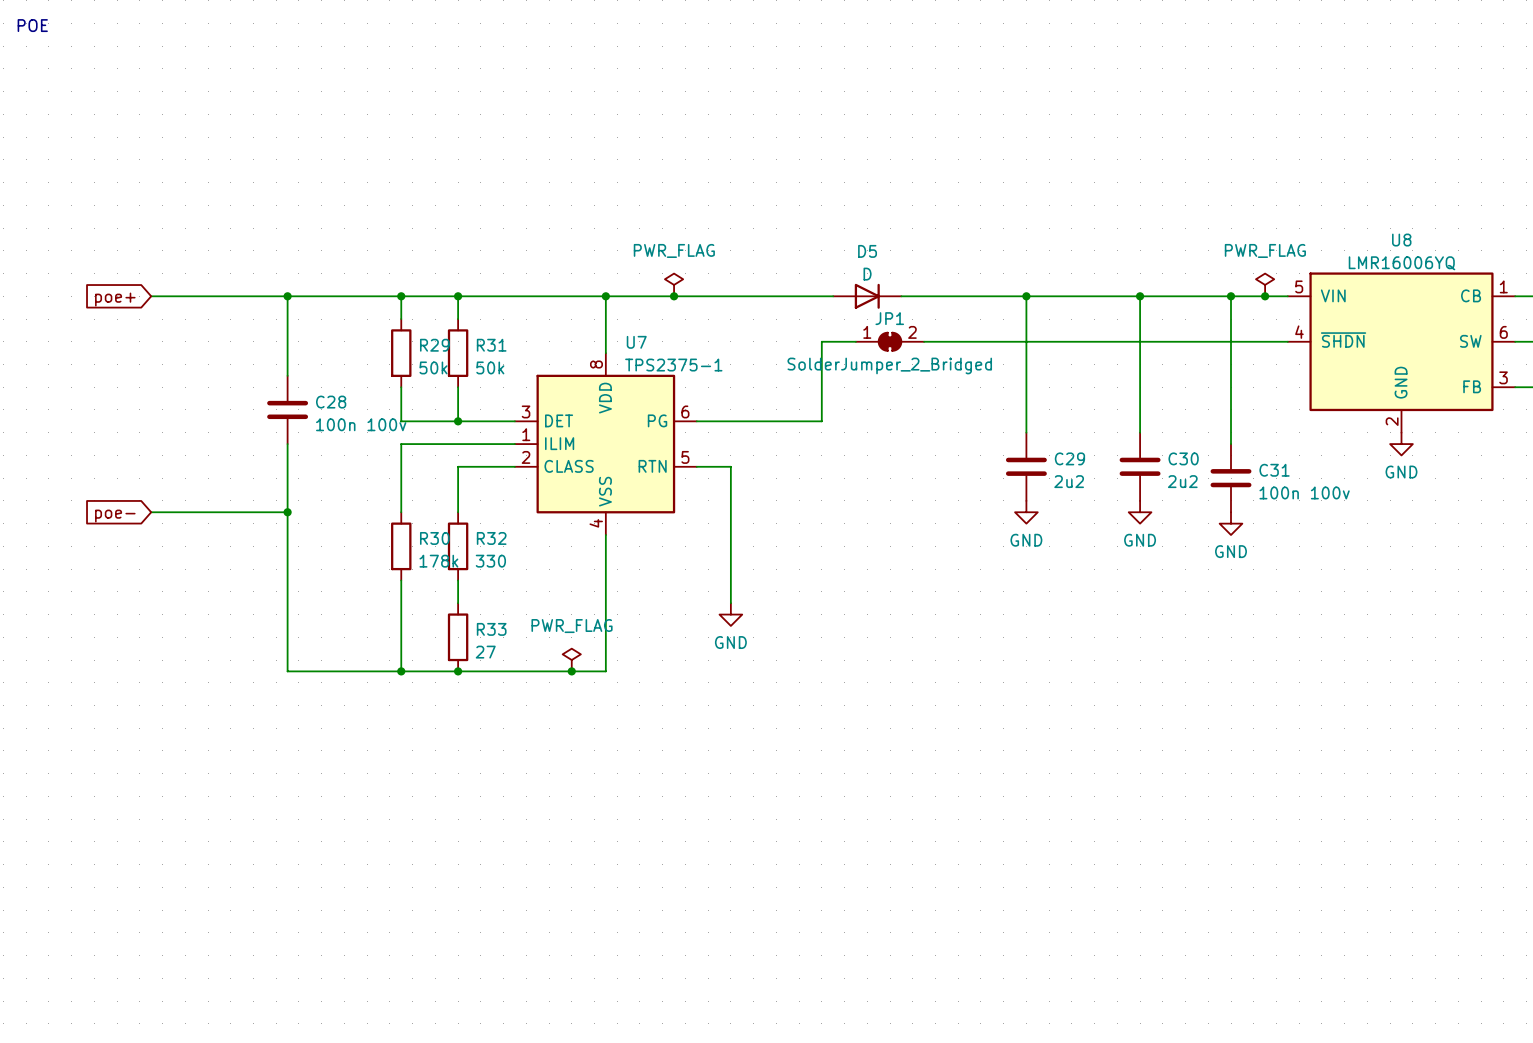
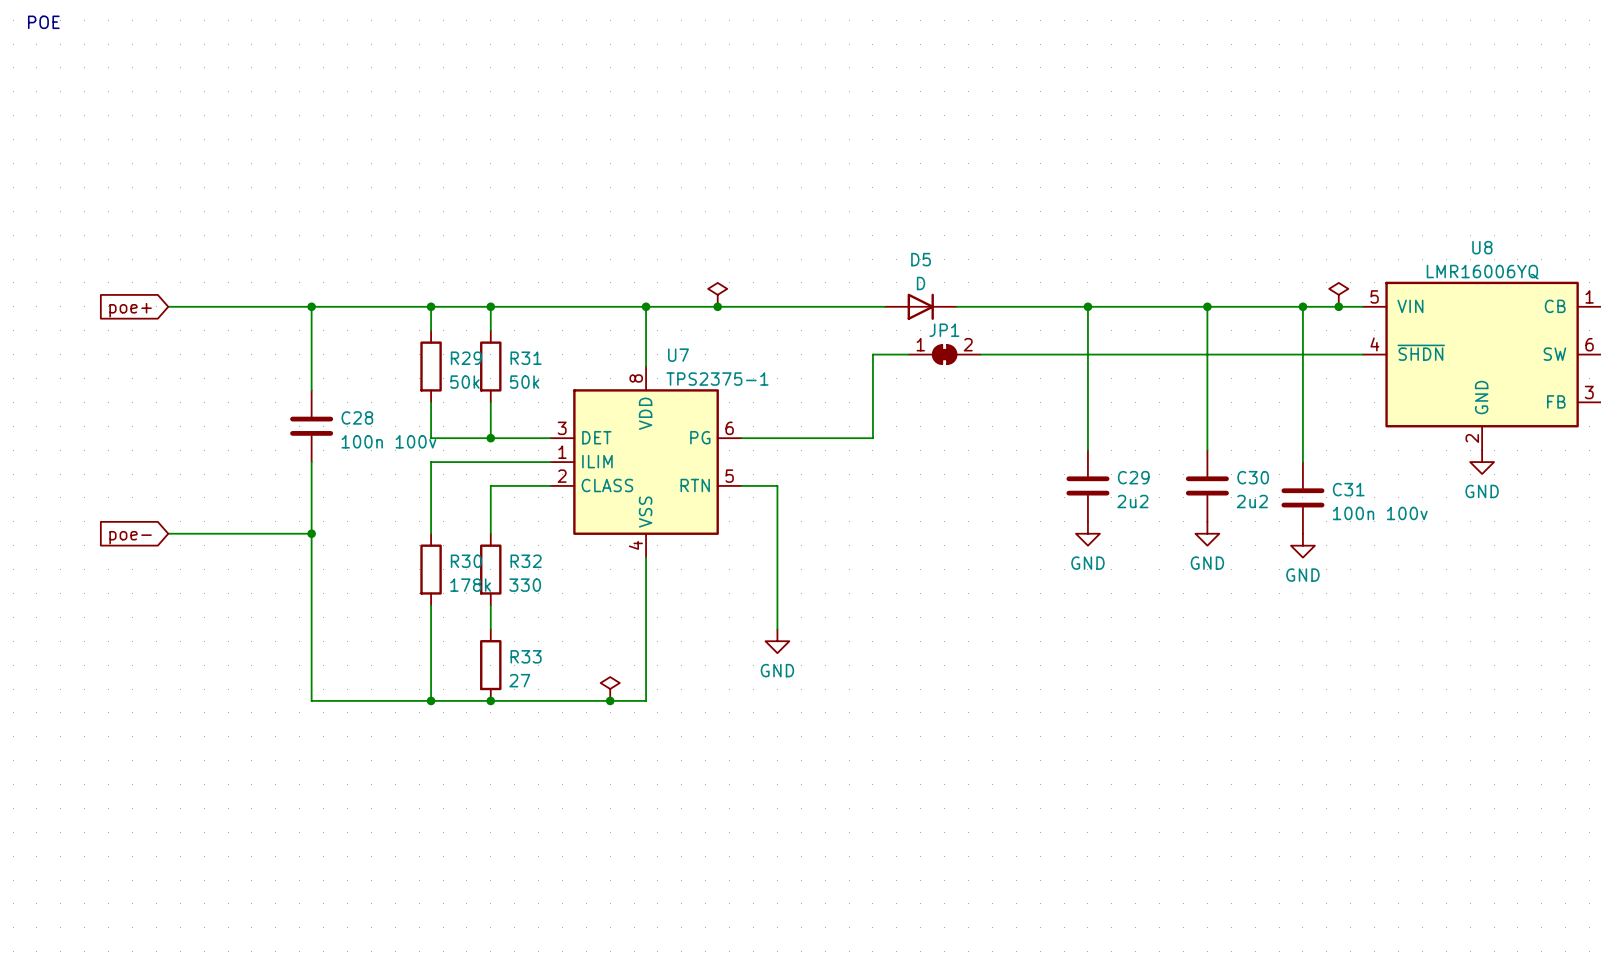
power symbol text: PWR_FLAG (674, 250) -> none
power symbol text: PWR_FLAG (1265, 250) -> none
JP1 value: SolderJumper_2_Bridged (889, 365) -> none
power symbol text: PWR_FLAG (572, 626) -> none

